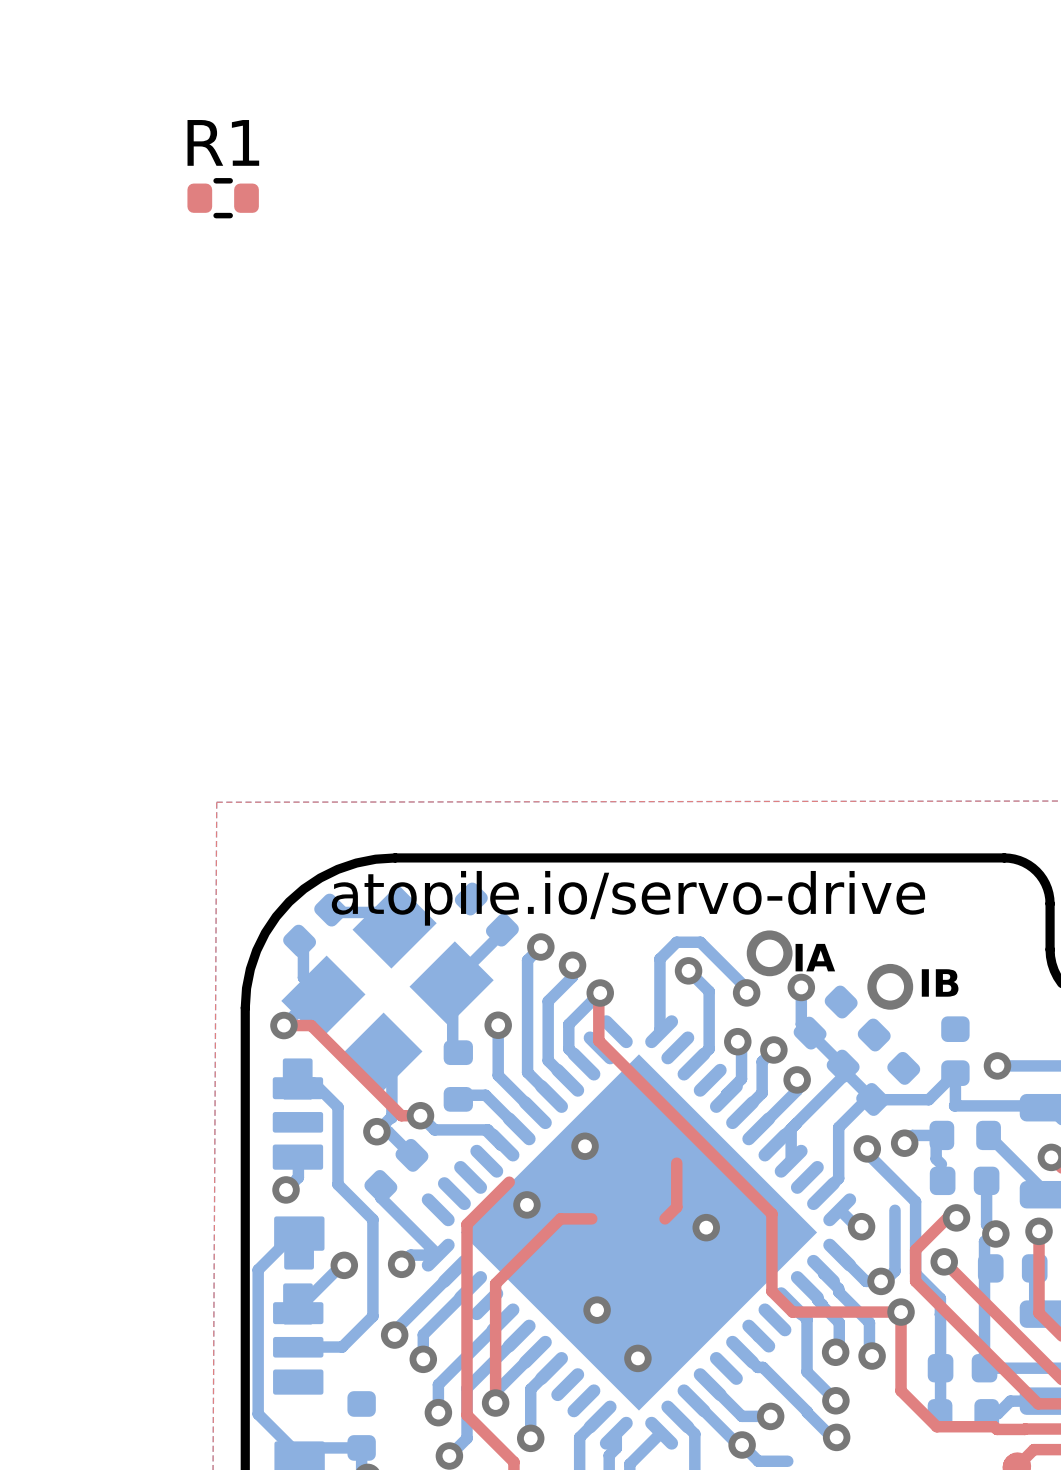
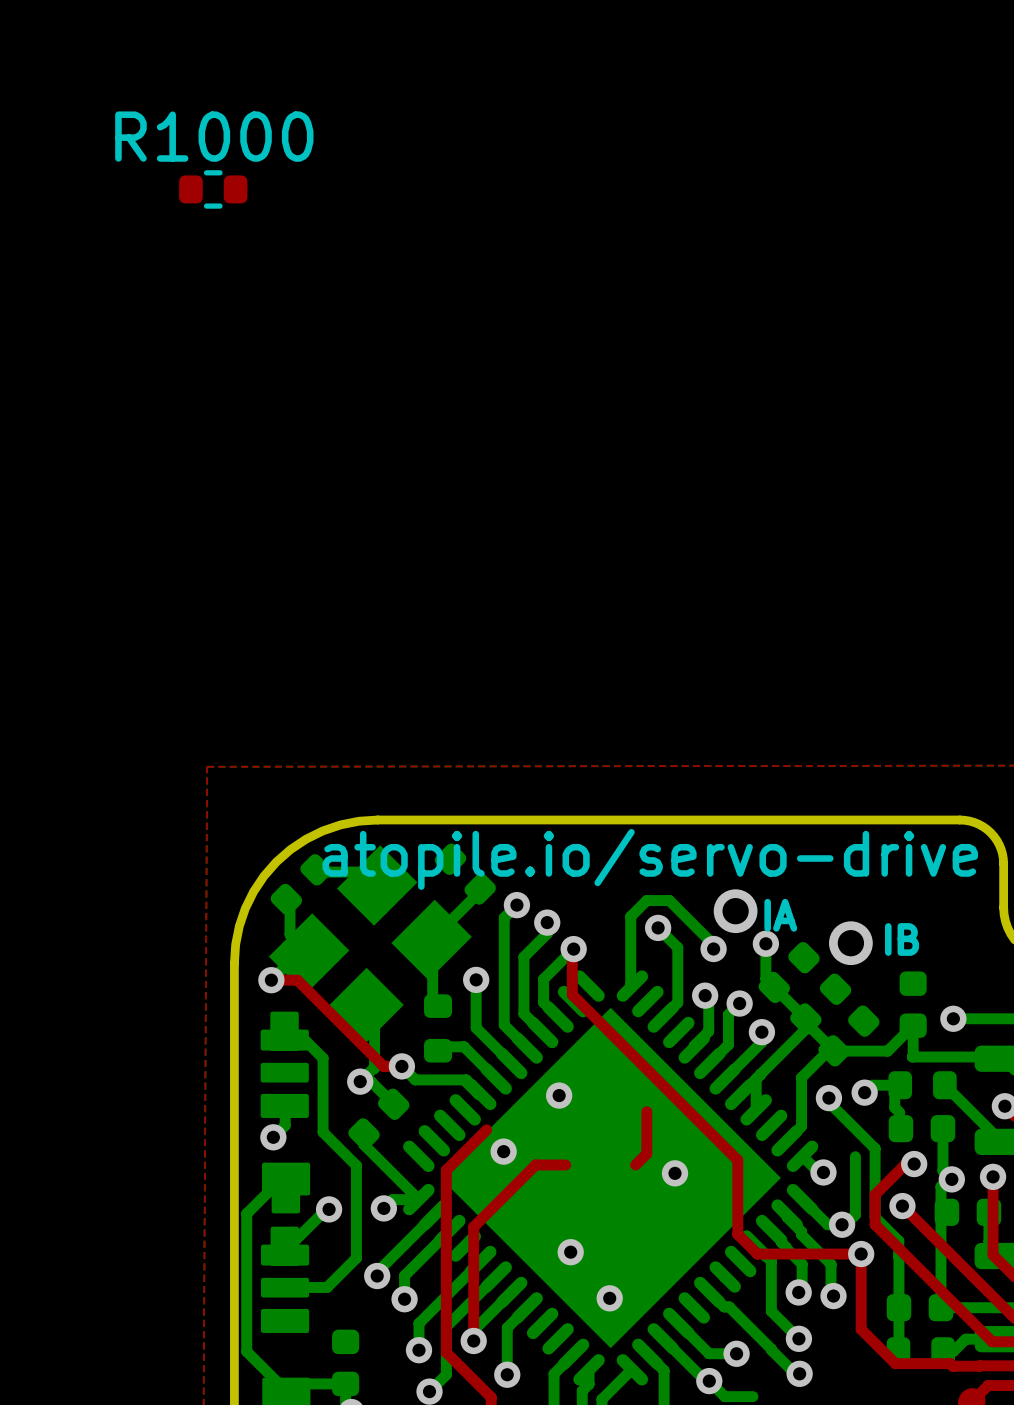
R1 name: R1 (223, 142) -> R1000 (214, 136)

